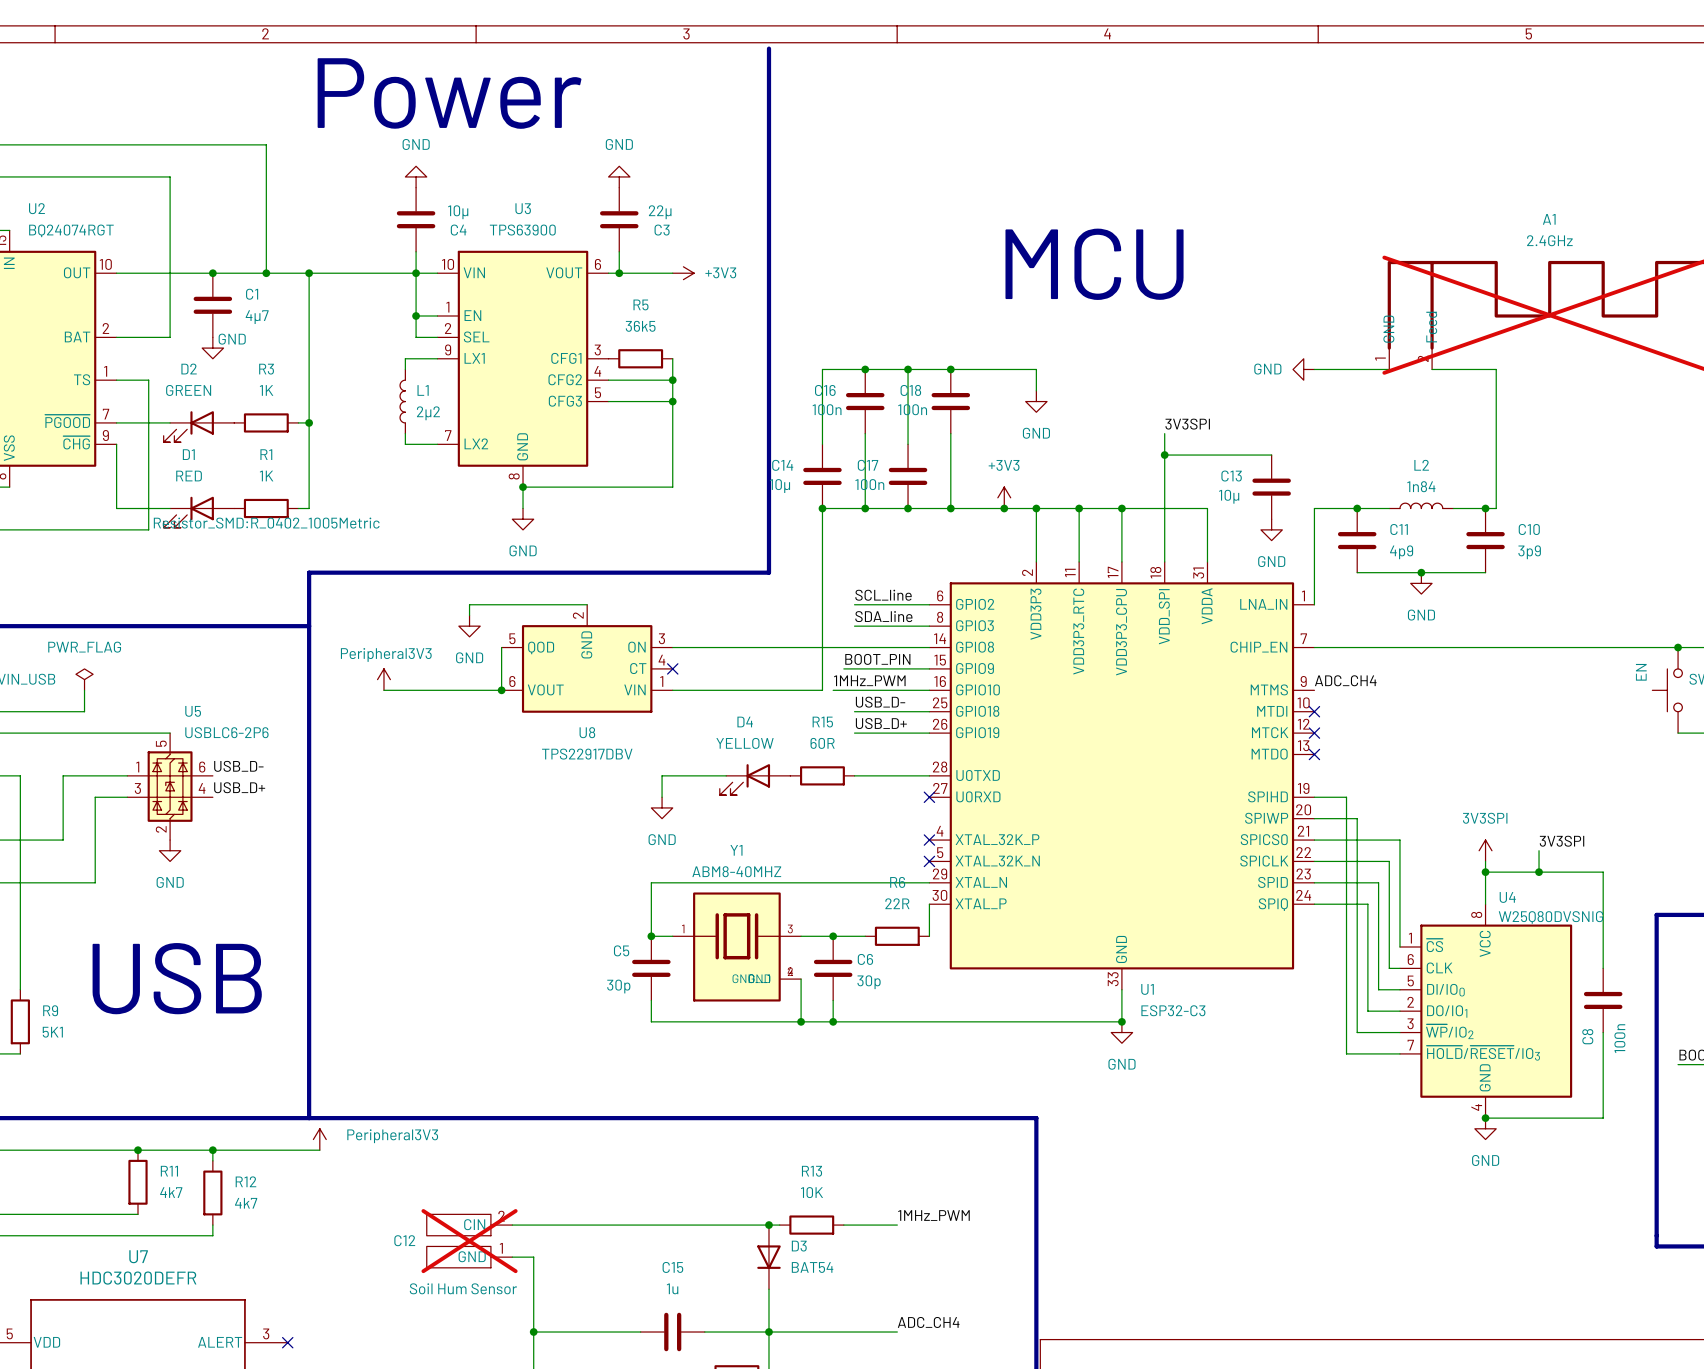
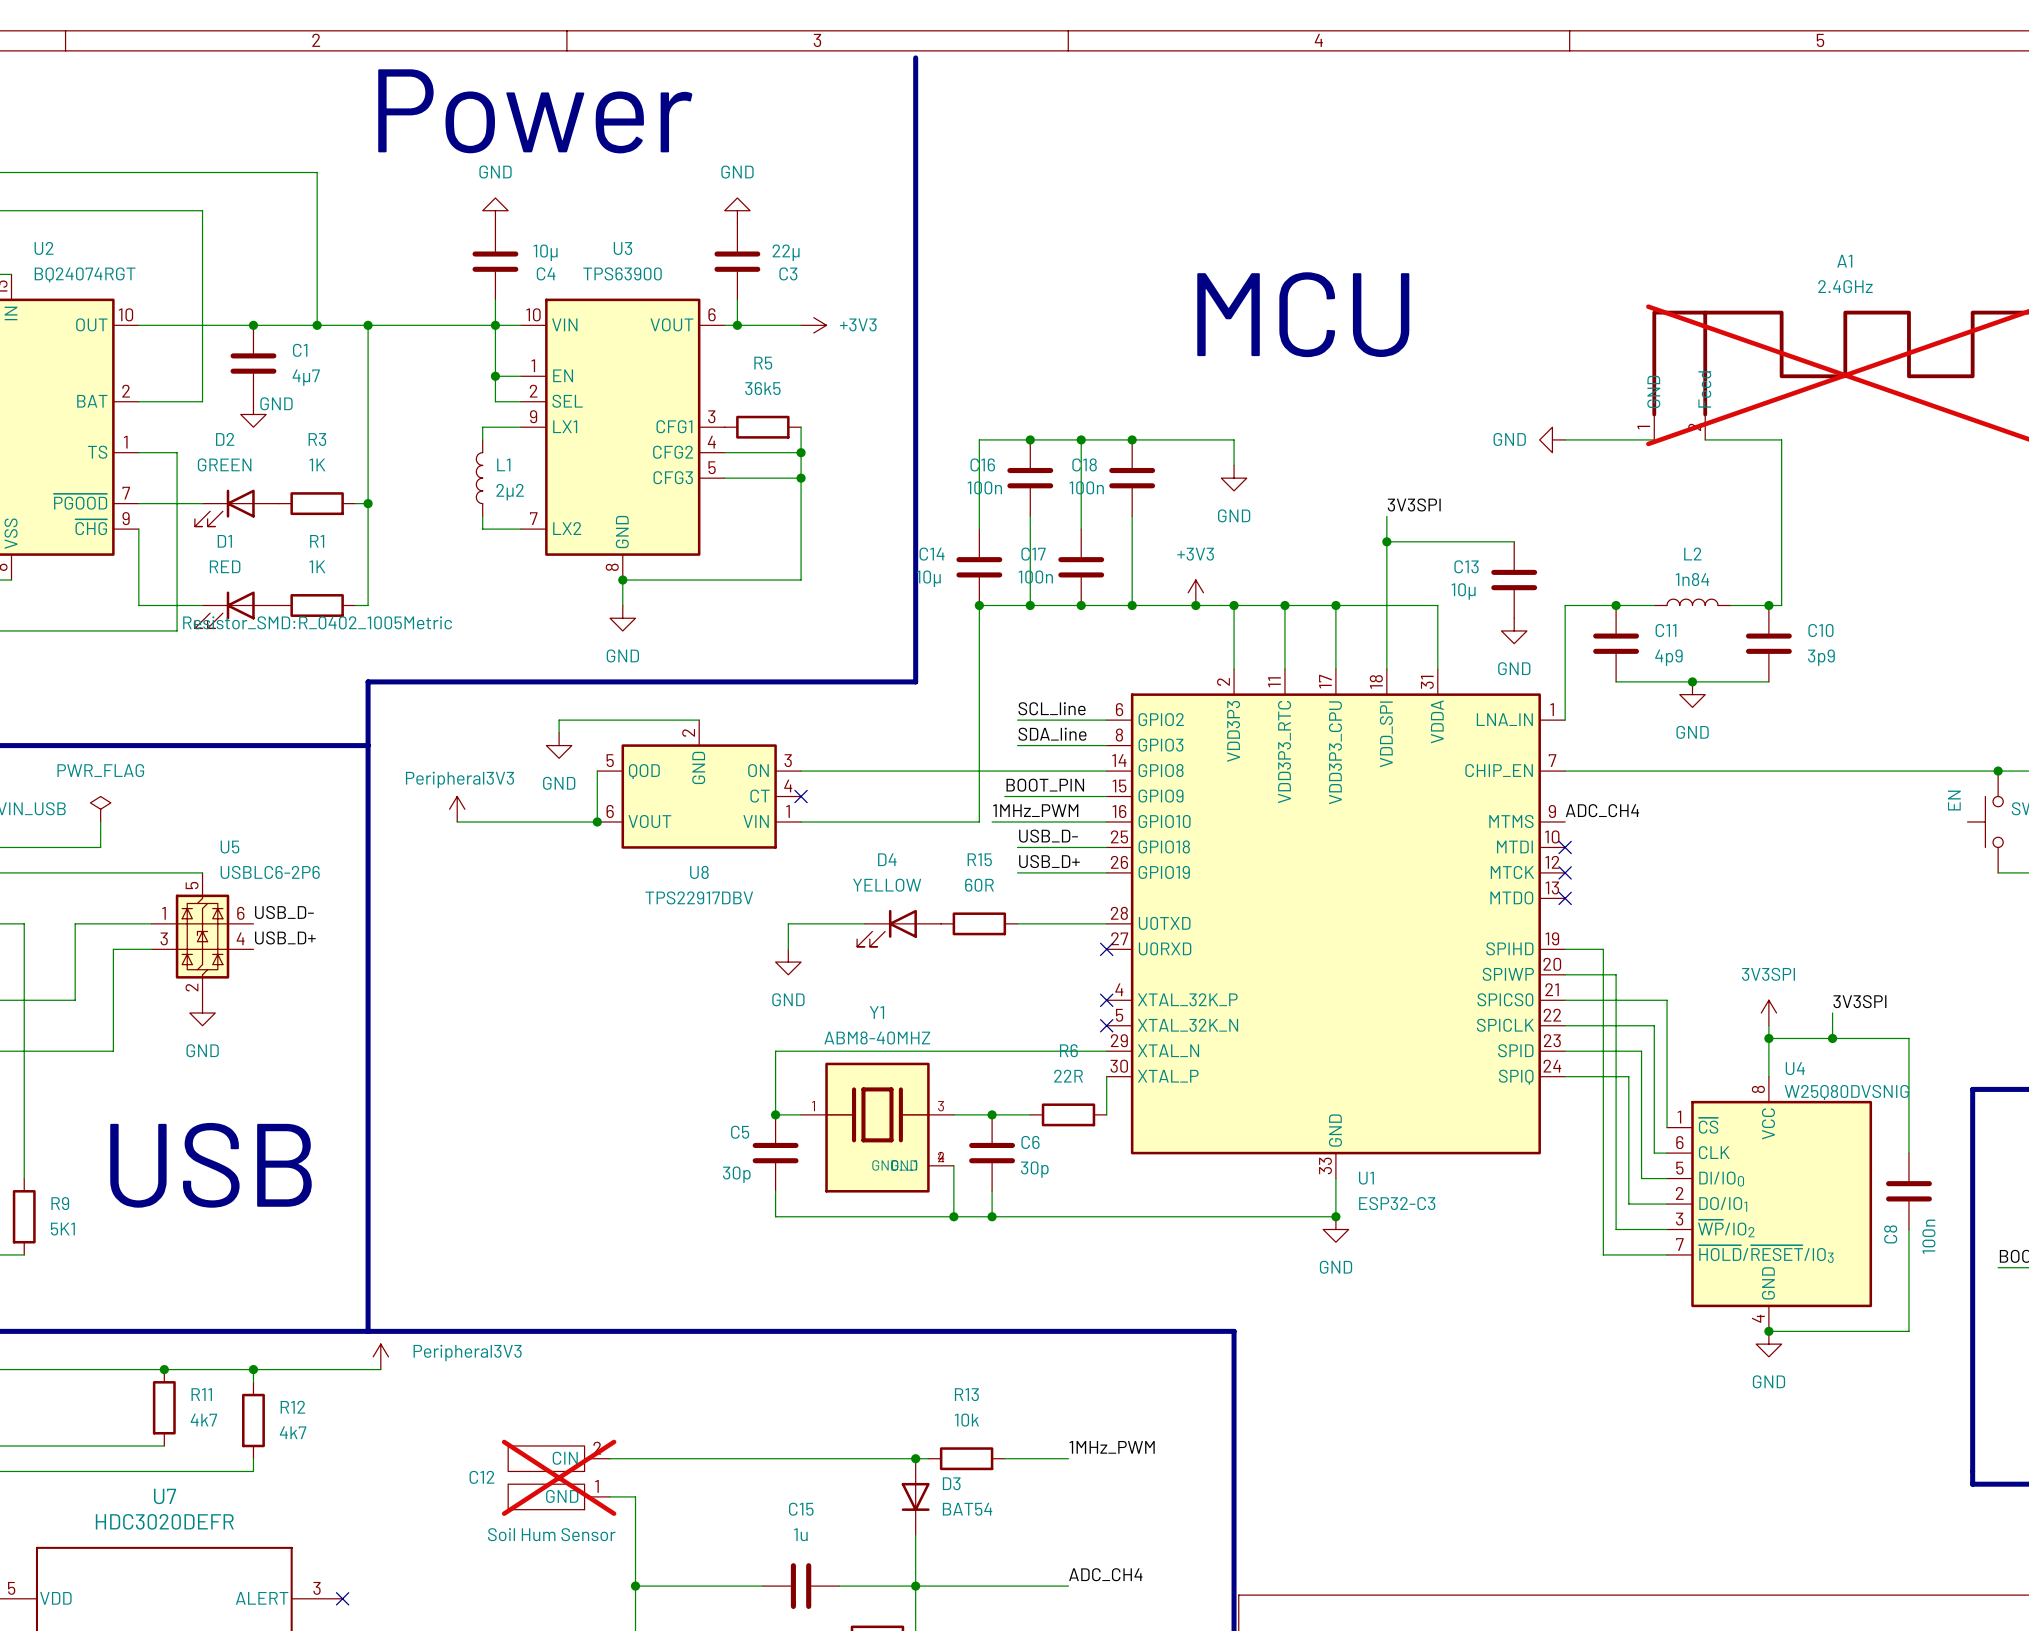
R13 value: 10K (812, 1192) -> 10k (966, 1420)

